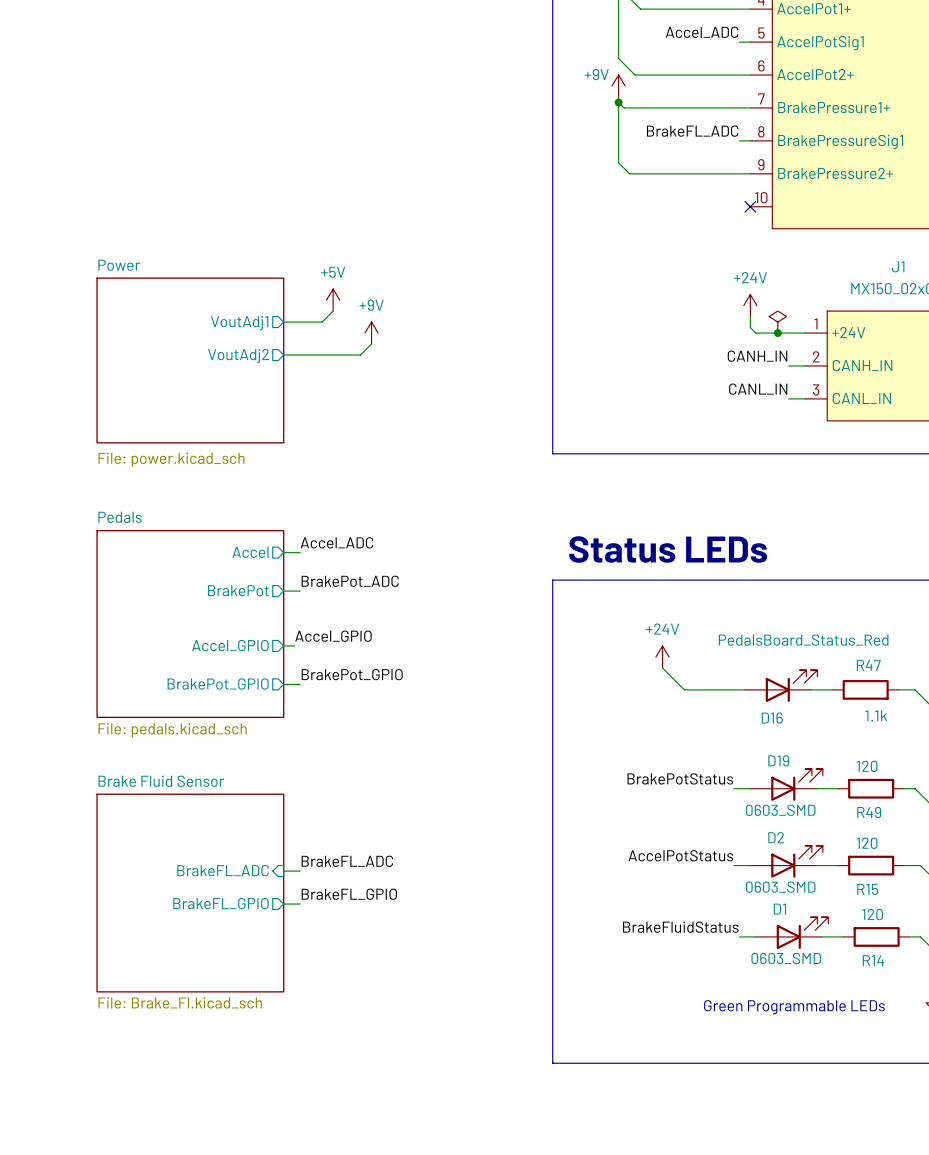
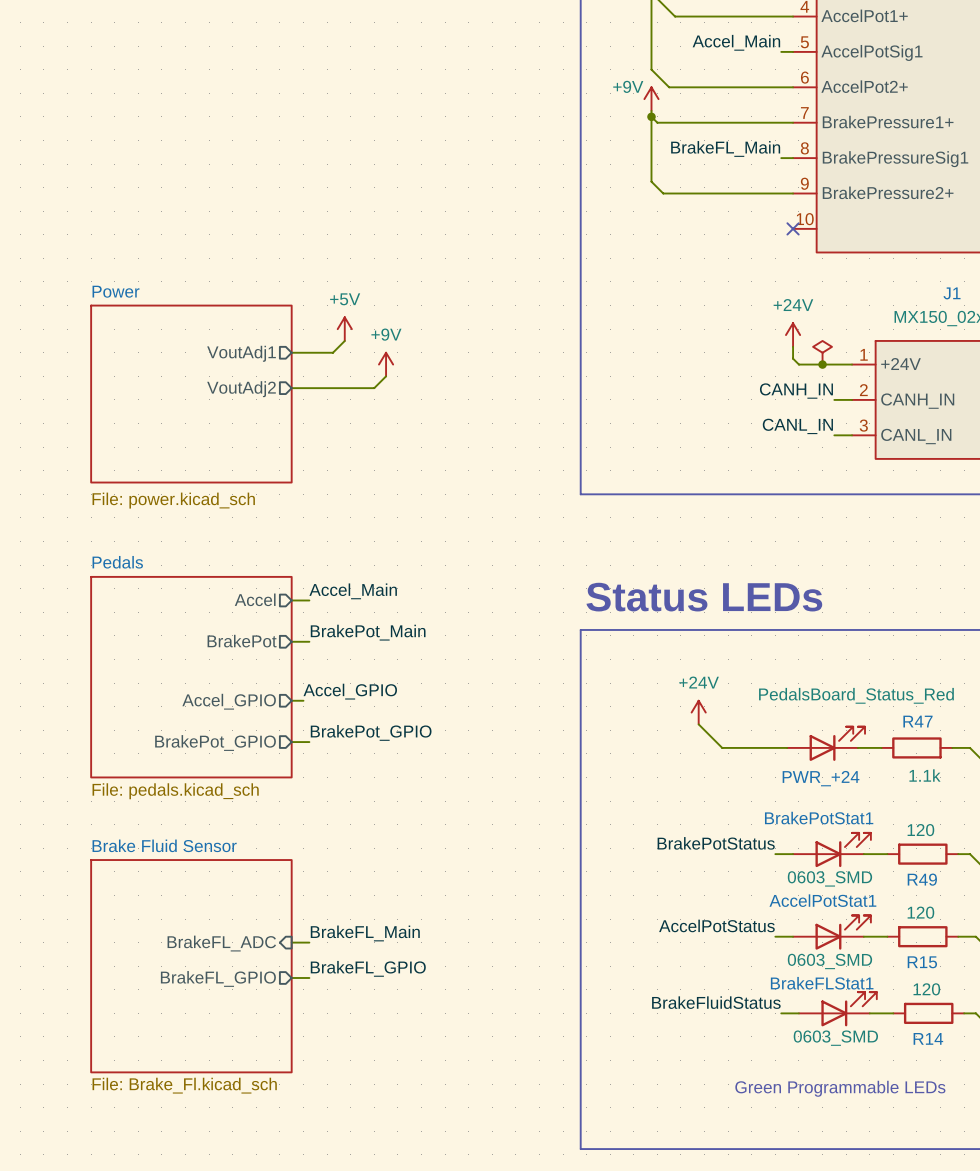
label: Accel_ADC (702, 32) -> Accel_Main (736, 42)
label: BrakeFL_ADC (692, 131) -> BrakeFL_Main (725, 148)
label: Accel_ADC (336, 542) -> Accel_Main (353, 591)
label: BrakePot_ADC (350, 581) -> BrakePot_Main (368, 632)
D16 name: D16 (772, 718) -> PWR_+24 (821, 778)
D19 name: D19 (778, 760) -> BrakePotStat1 (819, 818)
D2 name: D2 (776, 837) -> AccelPotStat1 (822, 900)
label: BrakeFL_ADC (347, 861) -> BrakeFL_Main (365, 933)
D1 name: D1 (779, 909) -> BrakeFLStat1 (822, 983)

